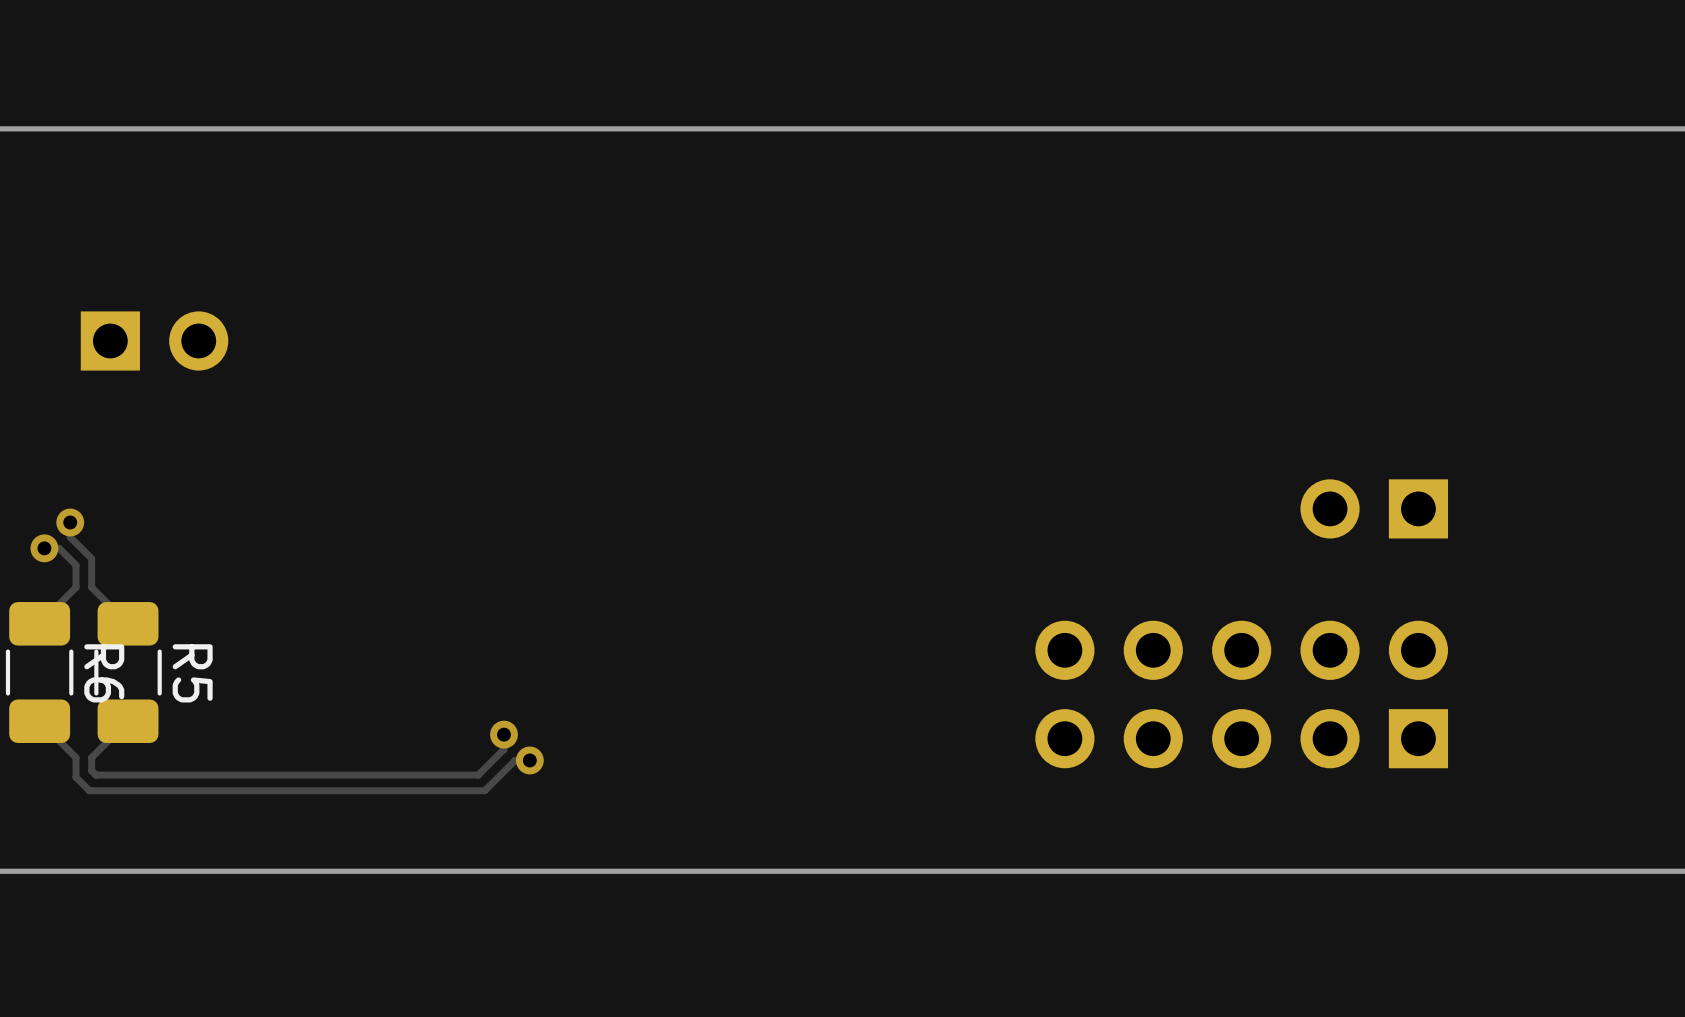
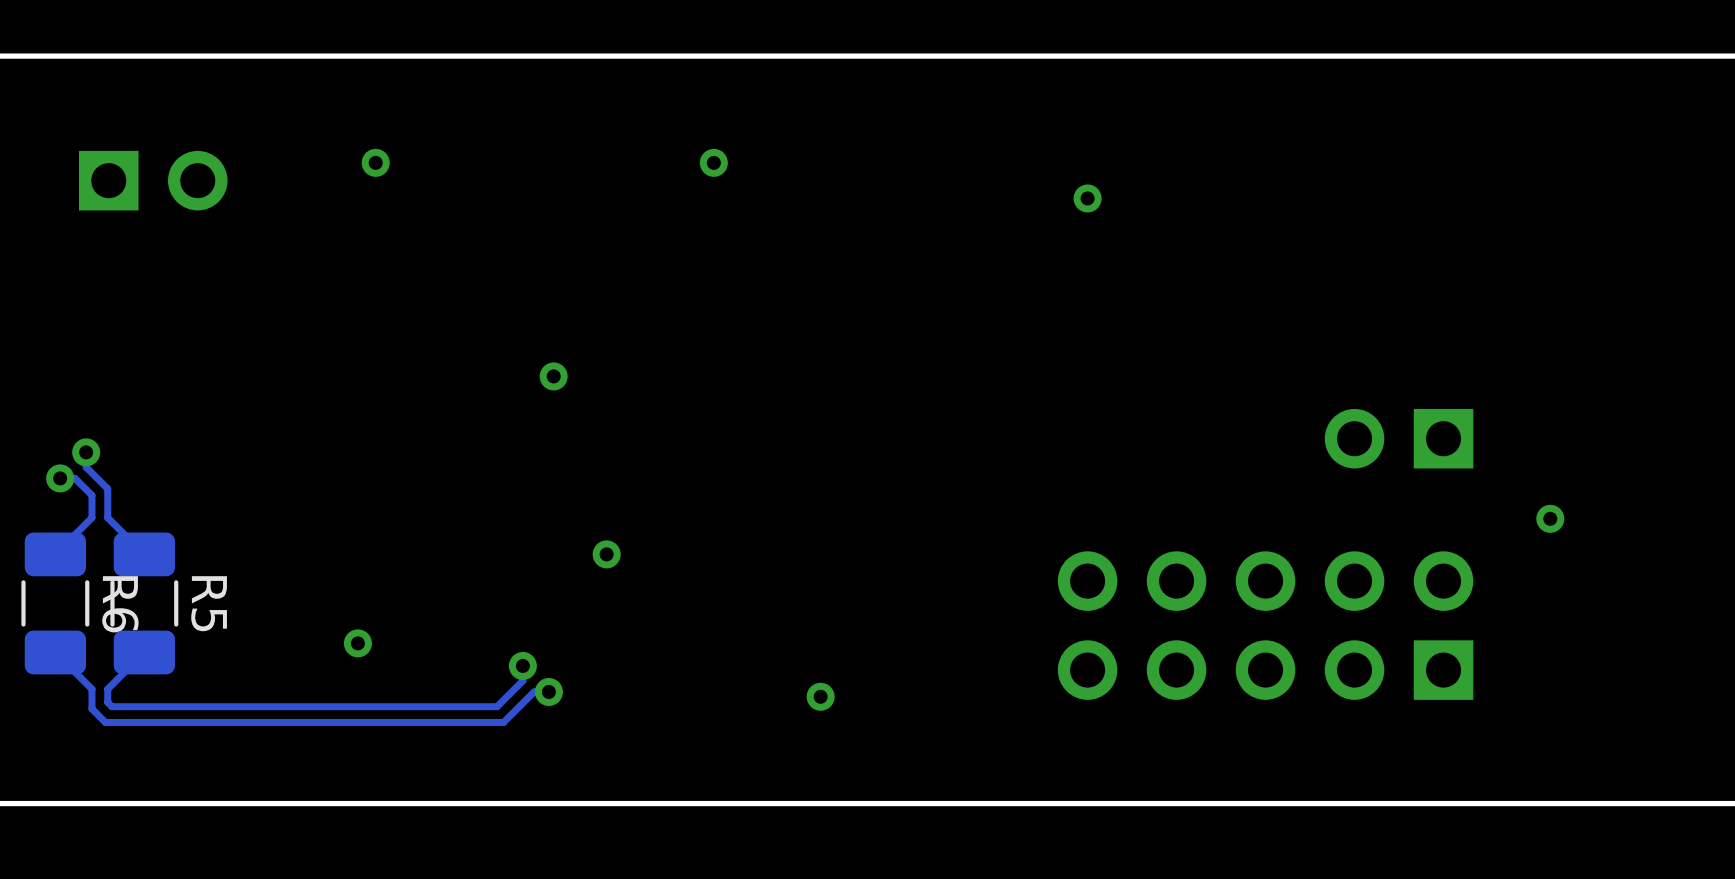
via: none -> (375, 162)
via: none -> (713, 162)
via: none -> (1087, 198)
part position: (154, 340) -> (153, 180)
via: none -> (553, 376)
via: none -> (1550, 518)
via: none -> (606, 554)
via: none -> (357, 643)
via: none -> (820, 696)

